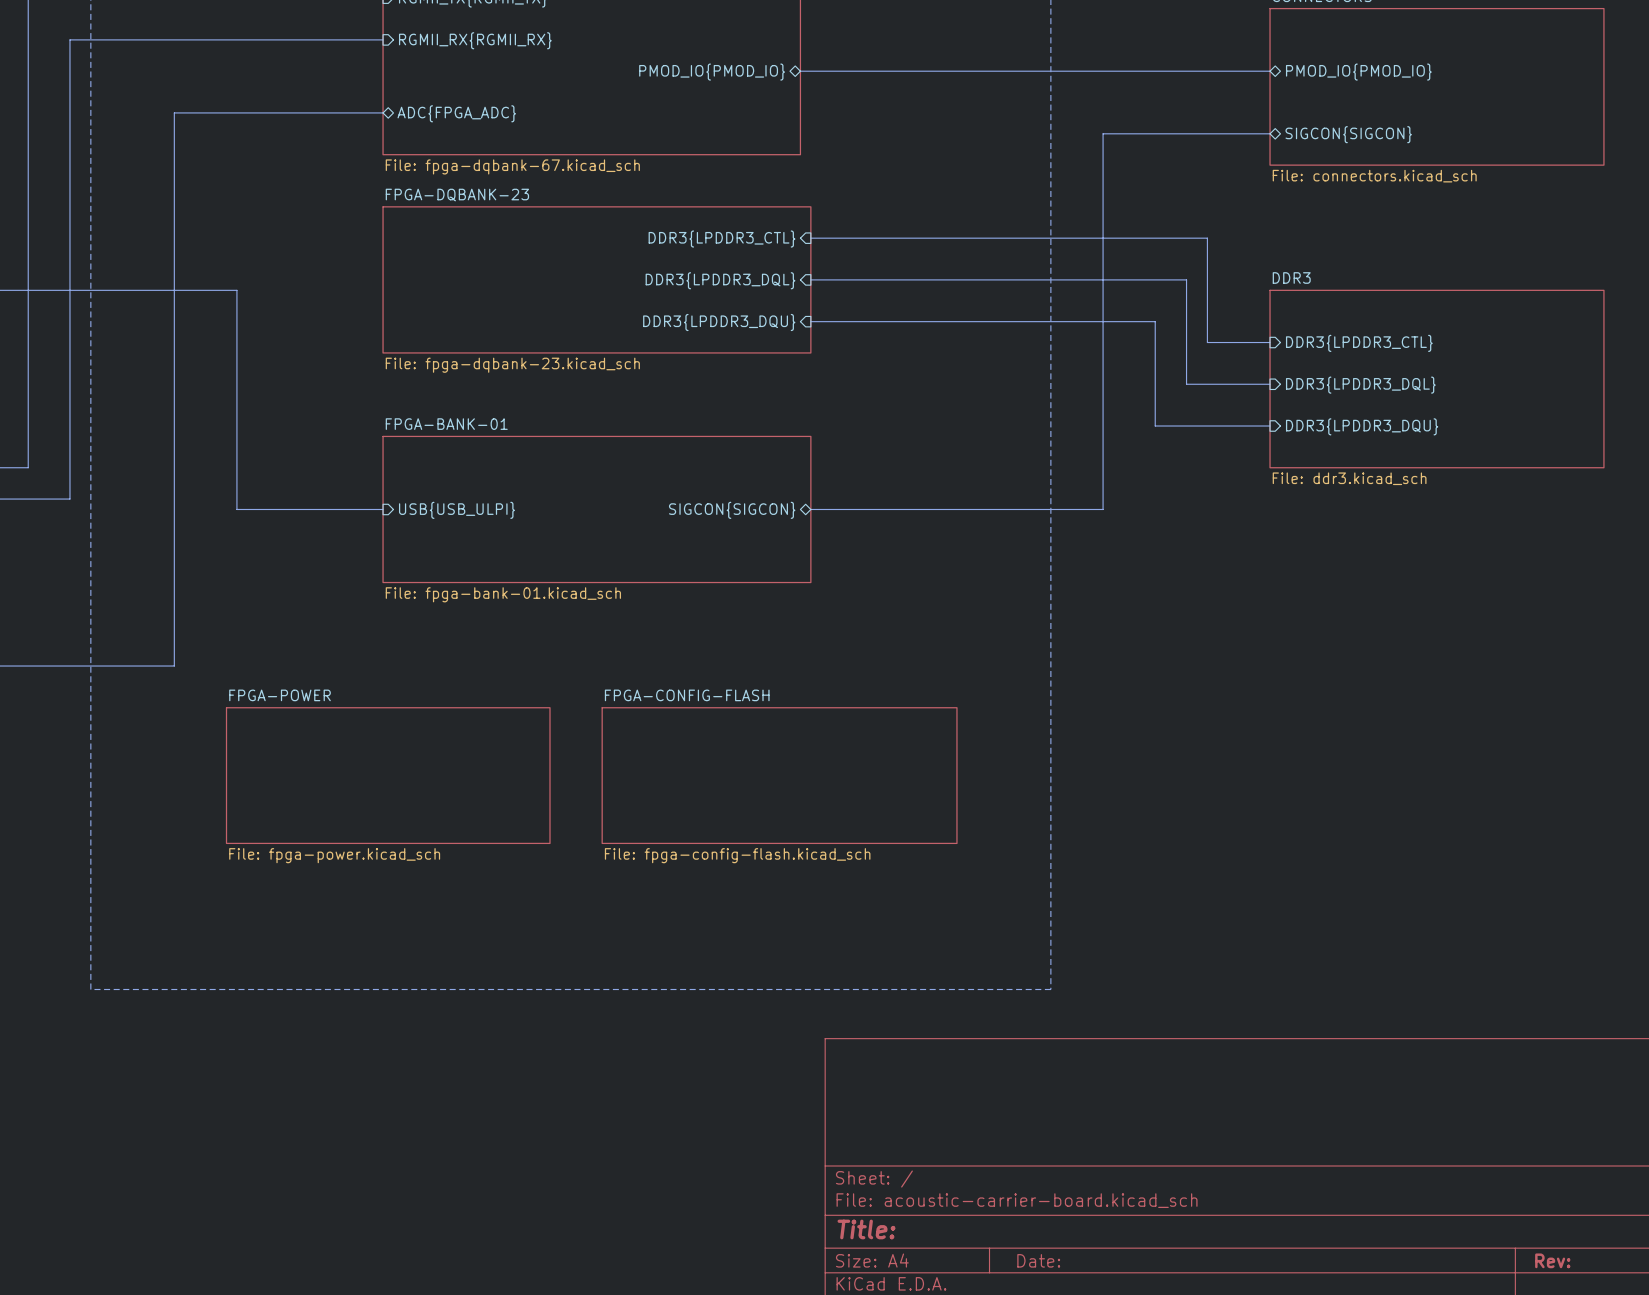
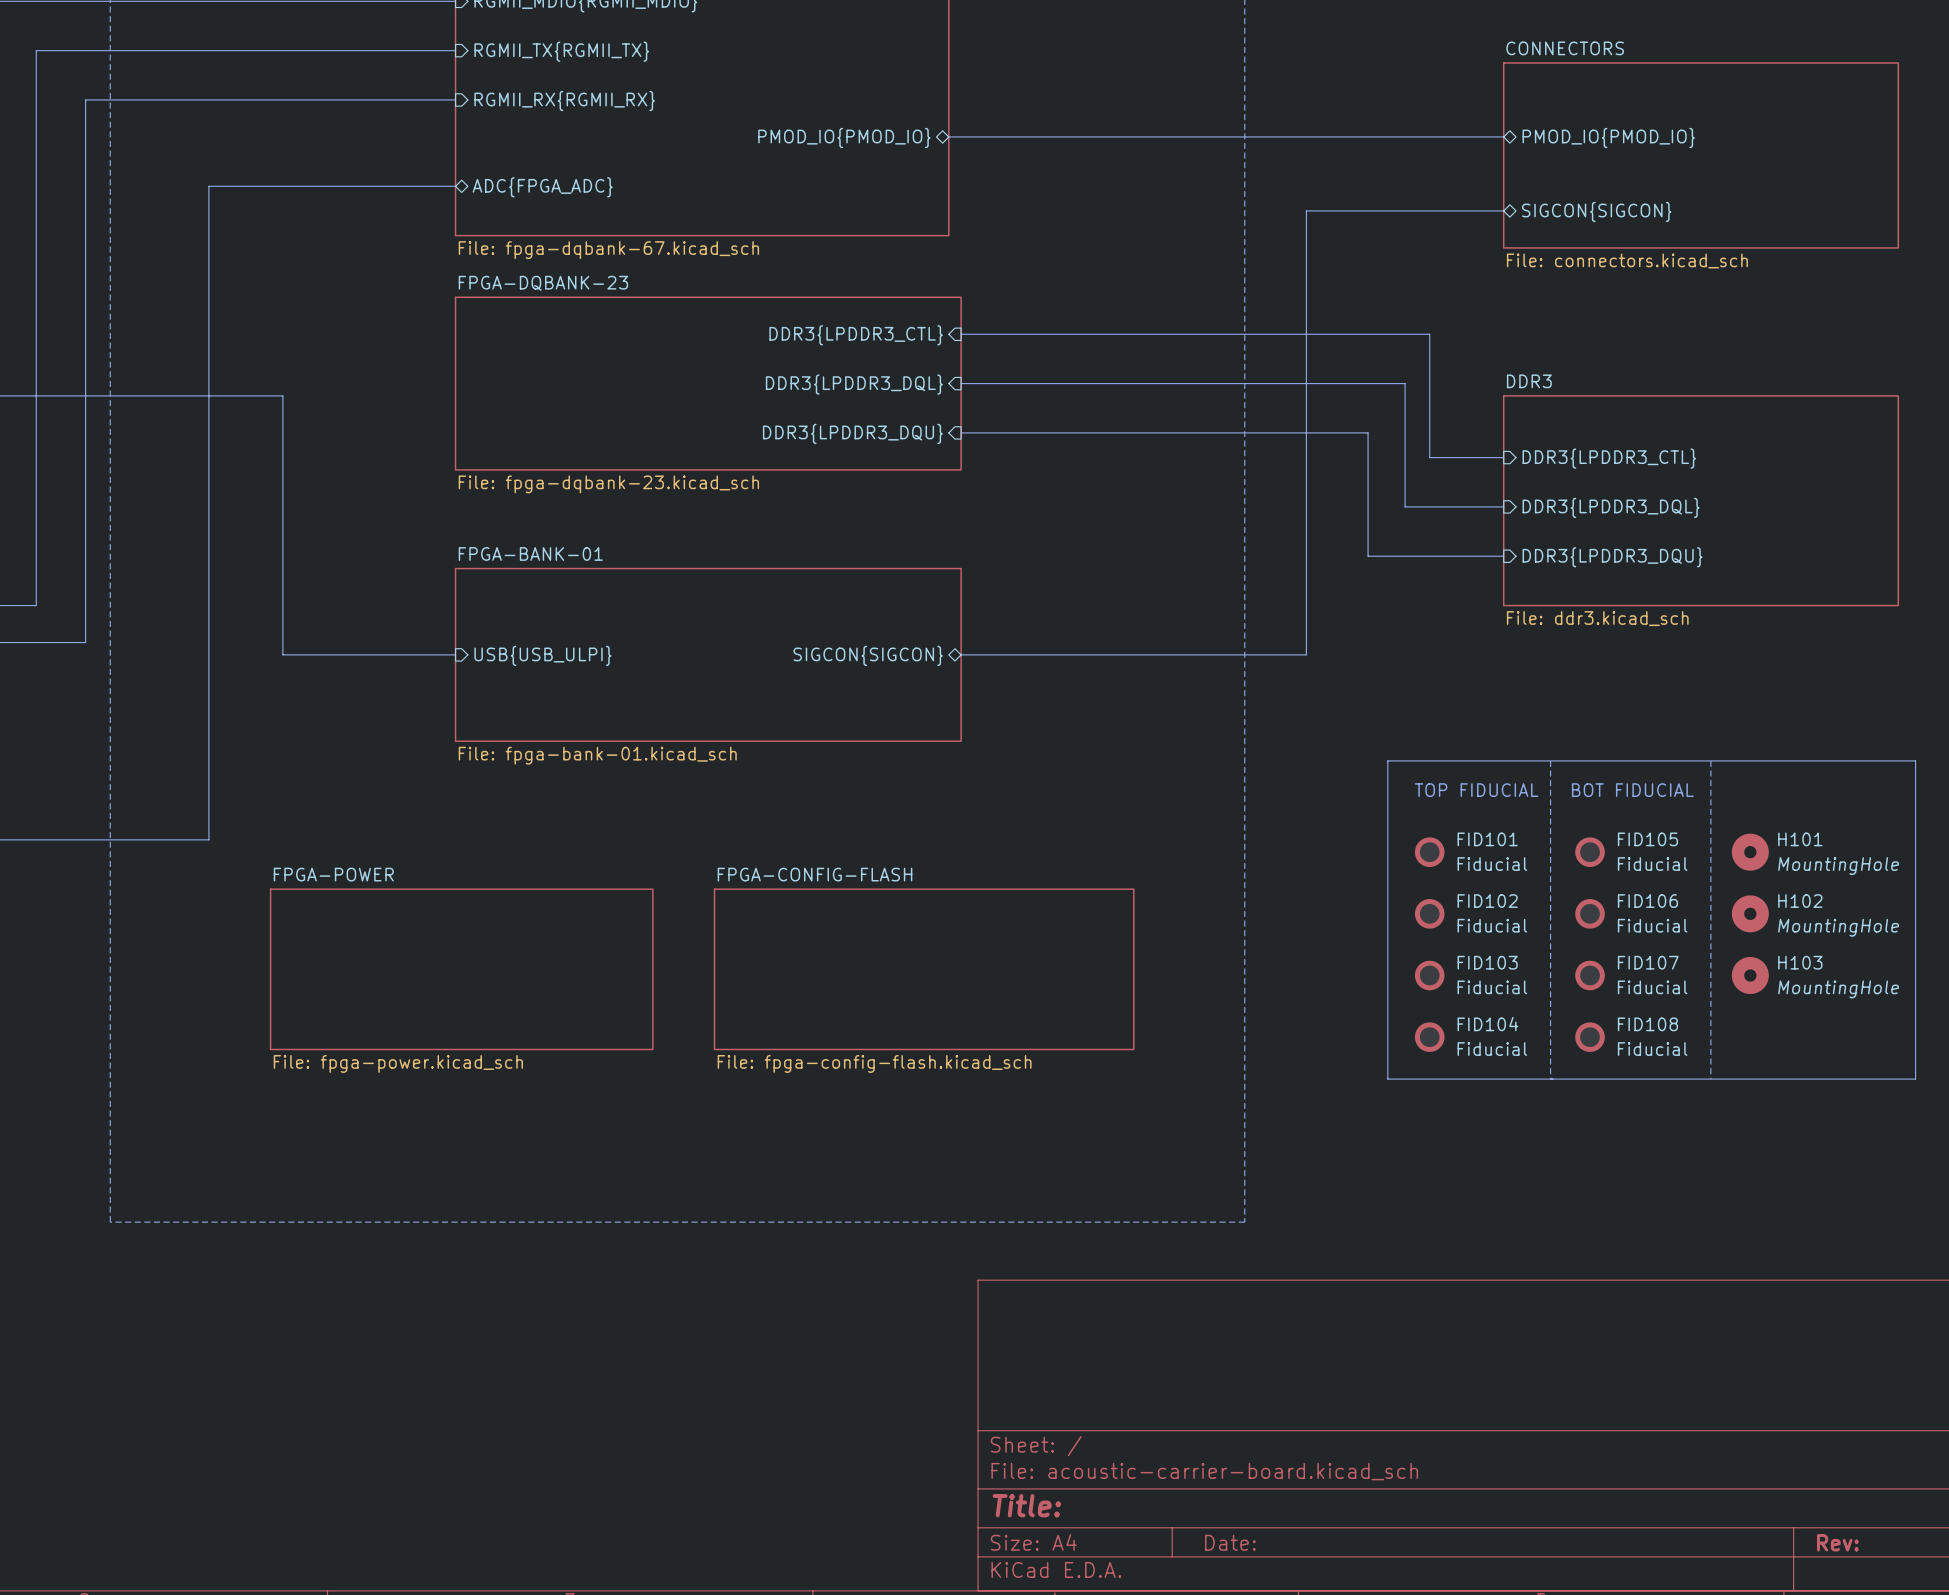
line: none -> (1387, 760) (1915, 760) (1915, 1079) (1387, 1079) (1387, 760)
line: none -> (1550, 760) (1550, 1079)
line: none -> (1710, 760) (1710, 1079)
text: none -> TOP FIDUCIAL (1476, 790)
text: none -> BOT FIDUCIAL (1632, 790)
FID101: none -> Fiducial (1429, 852)
FID105: none -> Fiducial (1590, 852)
H101: none -> MountingHole (1750, 852)
FID102: none -> Fiducial (1429, 913)
FID106: none -> Fiducial (1590, 913)
H102: none -> MountingHole (1750, 913)
FID103: none -> Fiducial (1429, 975)
FID107: none -> Fiducial (1590, 975)
H103: none -> MountingHole (1750, 975)
FID104: none -> Fiducial (1429, 1037)
FID108: none -> Fiducial (1590, 1037)

